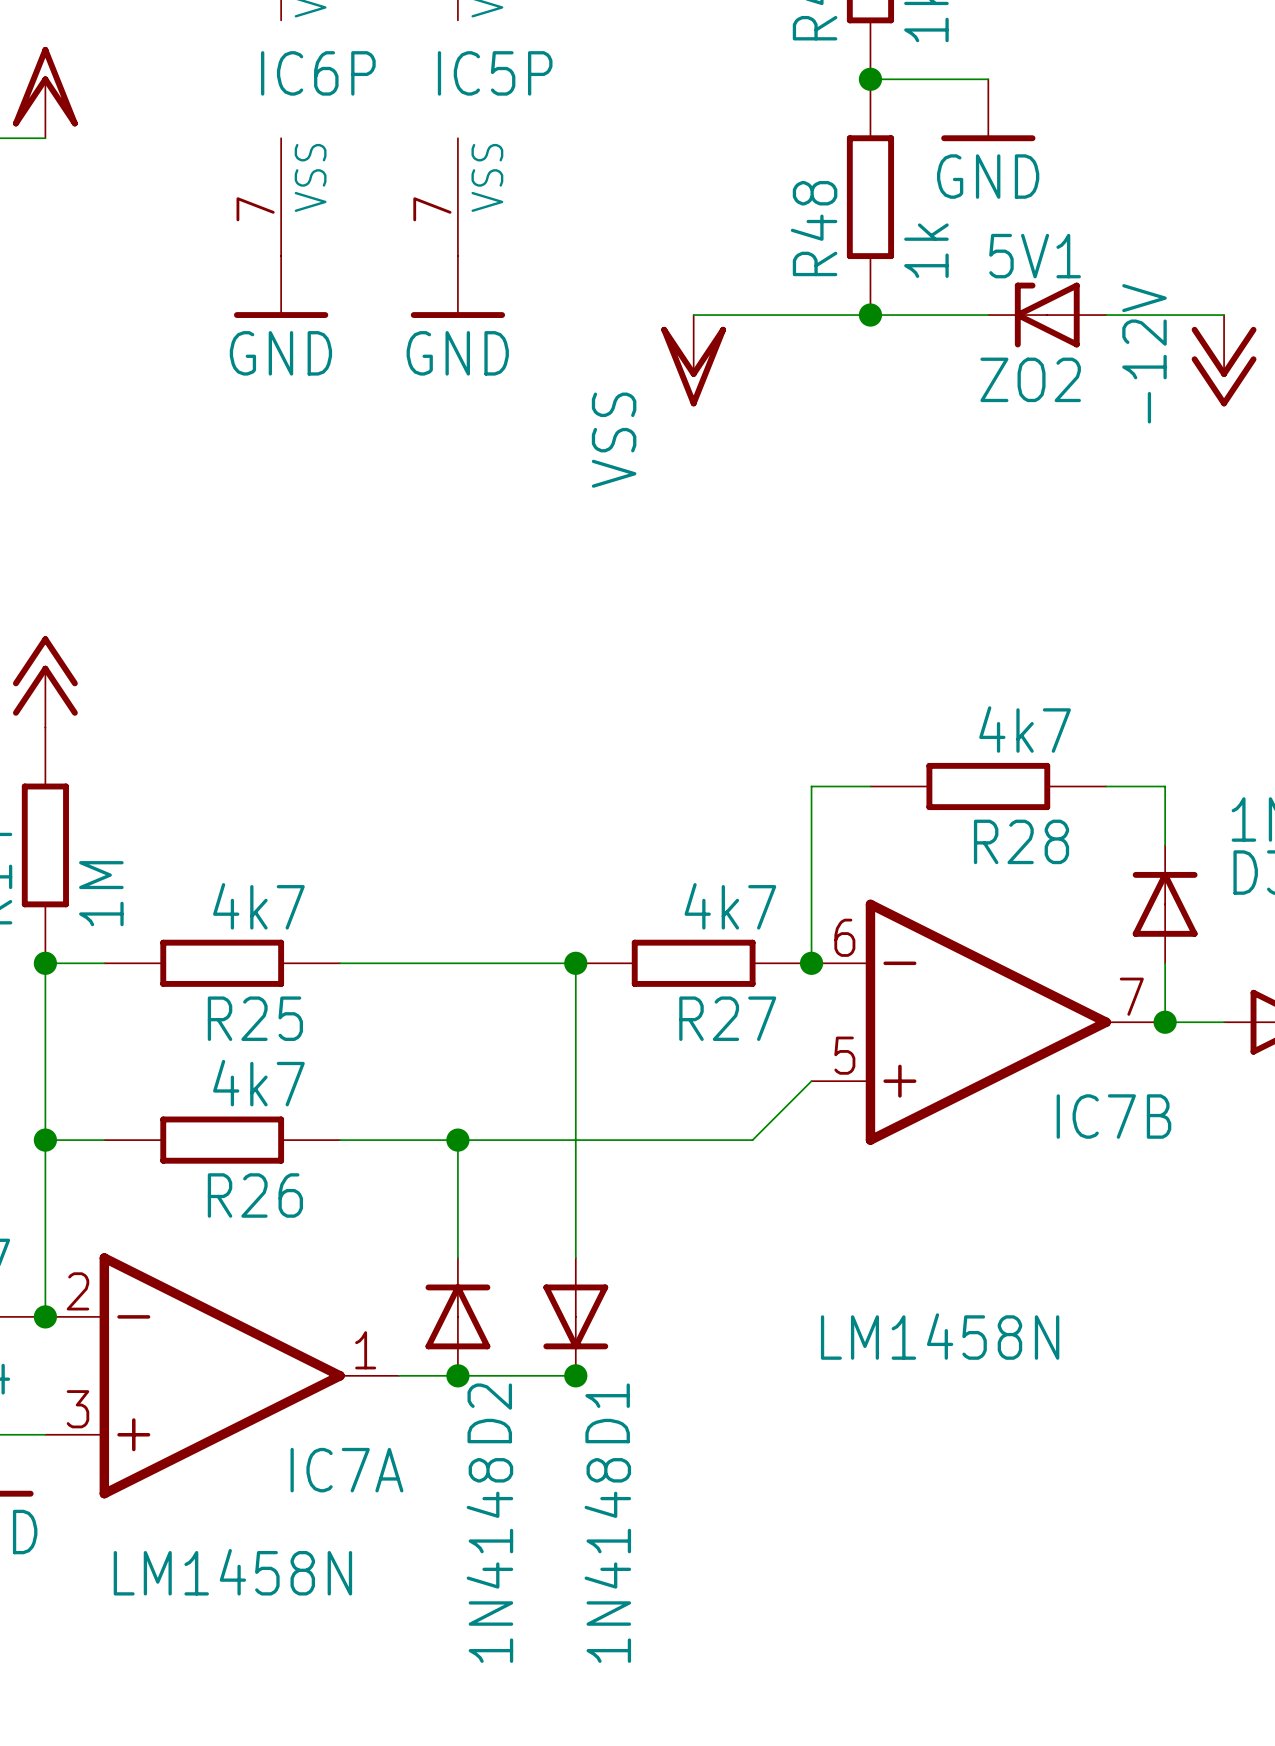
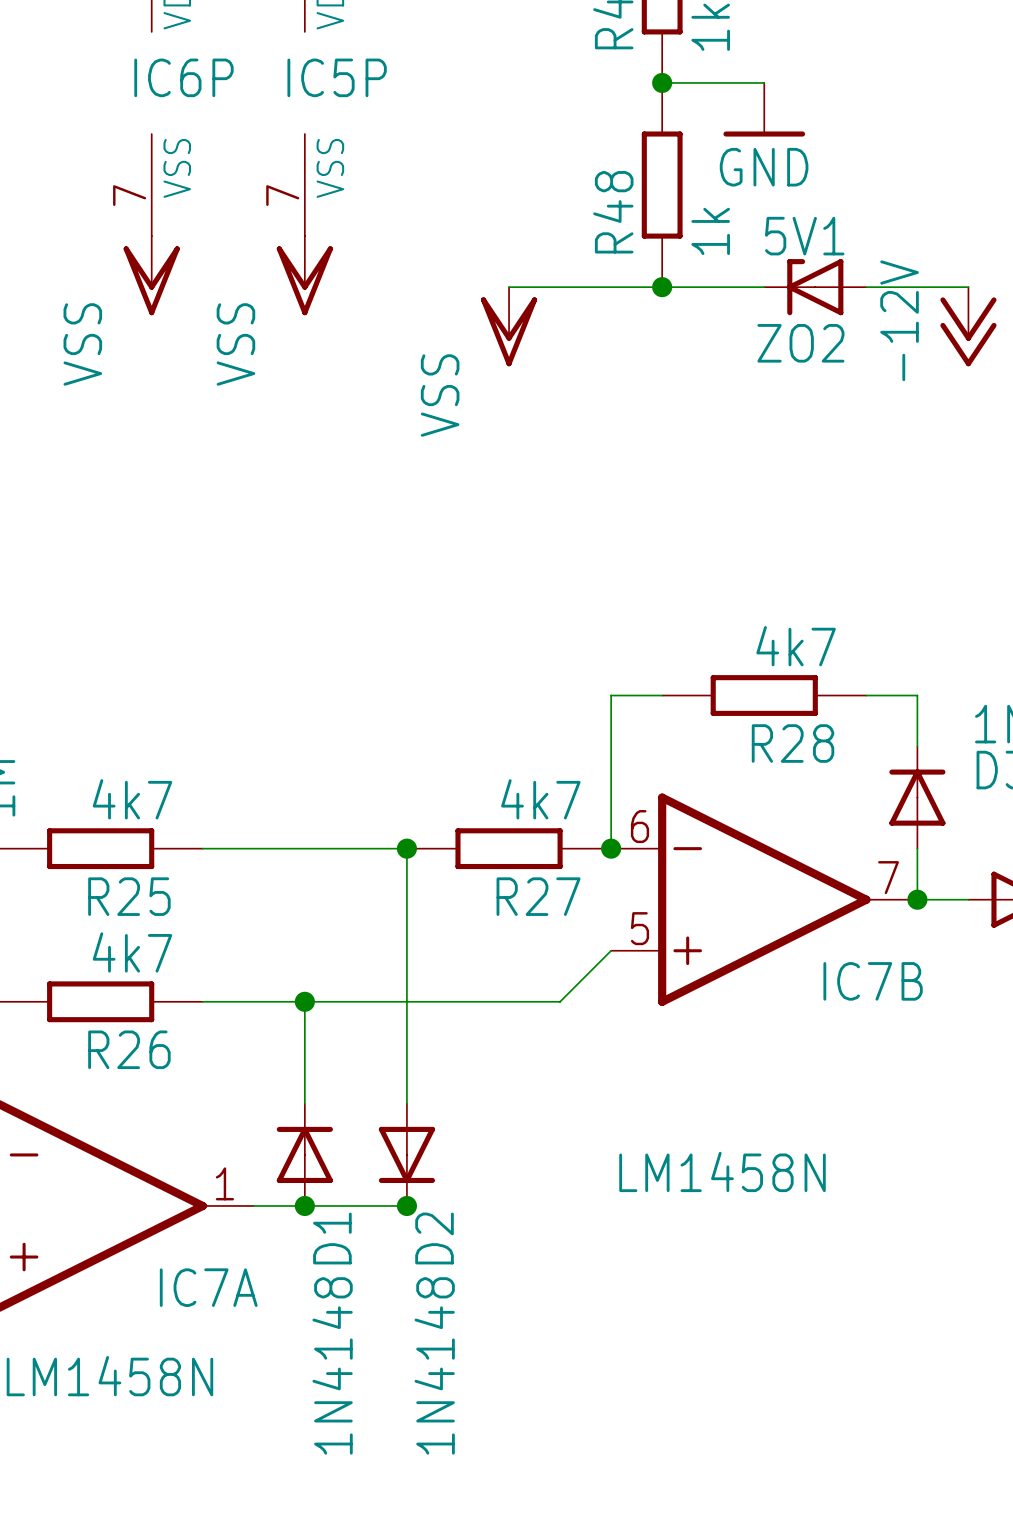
power symbol: GND (281, 287) -> VSS (151, 275)
power symbol: GND (457, 287) -> VSS (304, 275)
D2 name: D2 (489, 1413) -> D1 (332, 1238)
D1 name: D1 (607, 1413) -> D2 (434, 1238)

